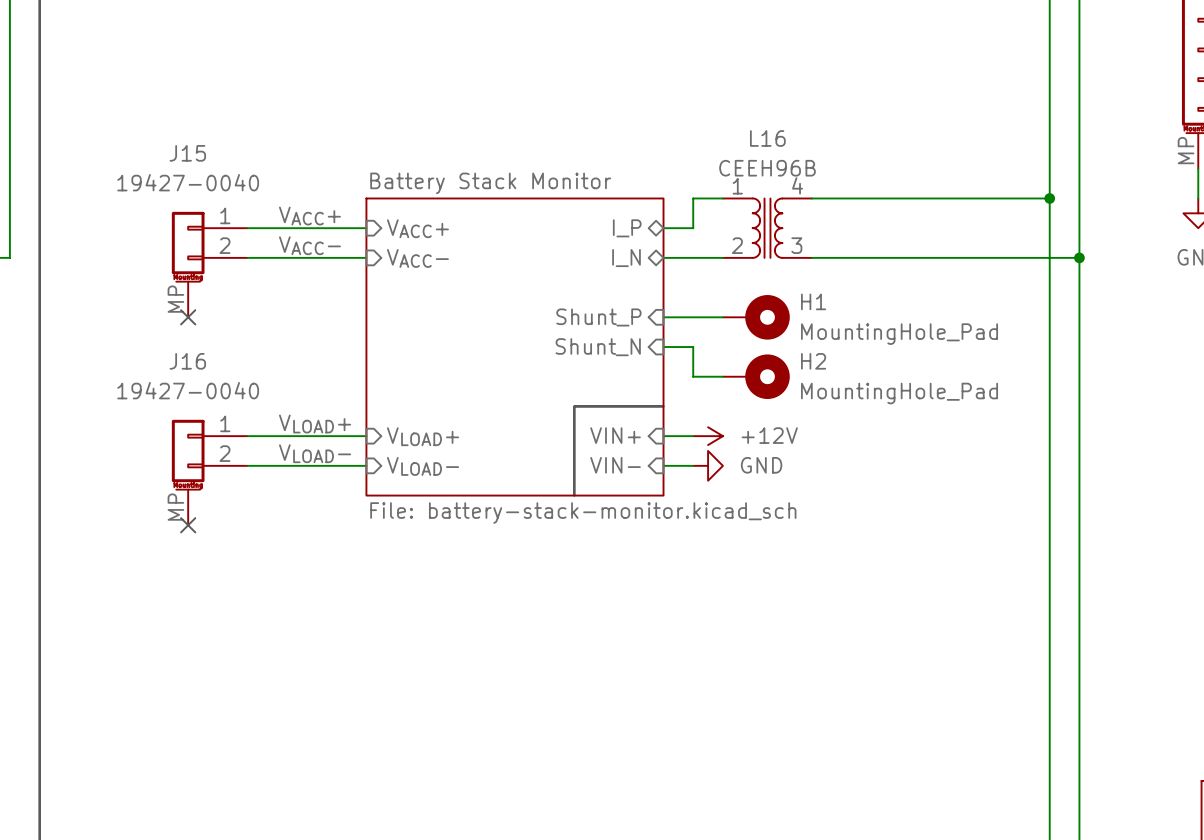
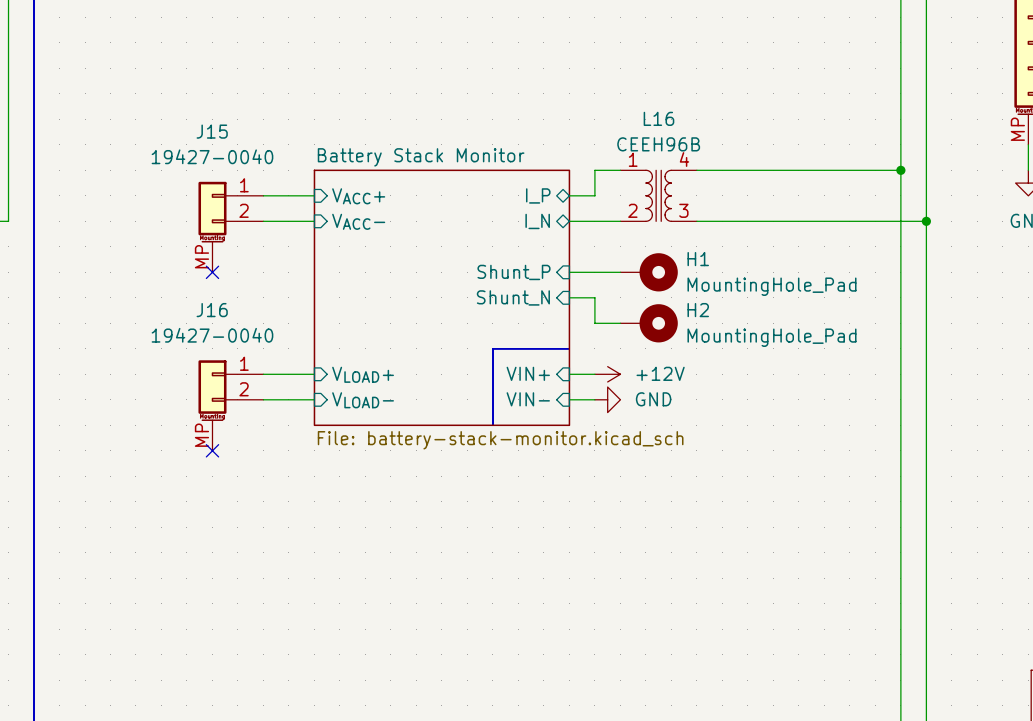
label: VACC+ (309, 216) -> none
label: VACC- (309, 245) -> none
J15 position: (209, 264) -> (230, 227)
no-connect mark position: (188, 317) -> (212, 272)
label: VLOAD+ (315, 424) -> none
label: VLOAD- (315, 453) -> none
J16 position: (209, 472) -> (230, 405)
no-connect mark position: (188, 525) -> (212, 450)

